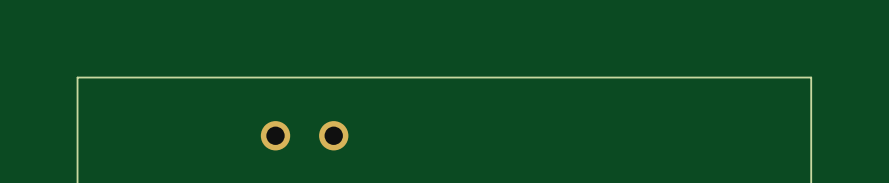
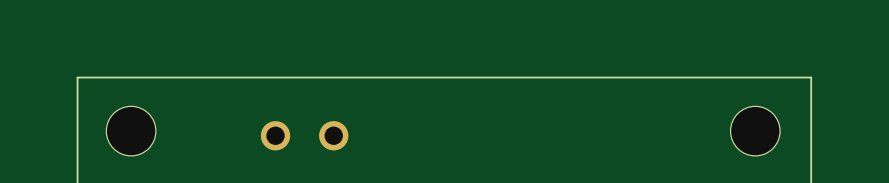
part: none -> (131, 131)
part: none -> (755, 131)

